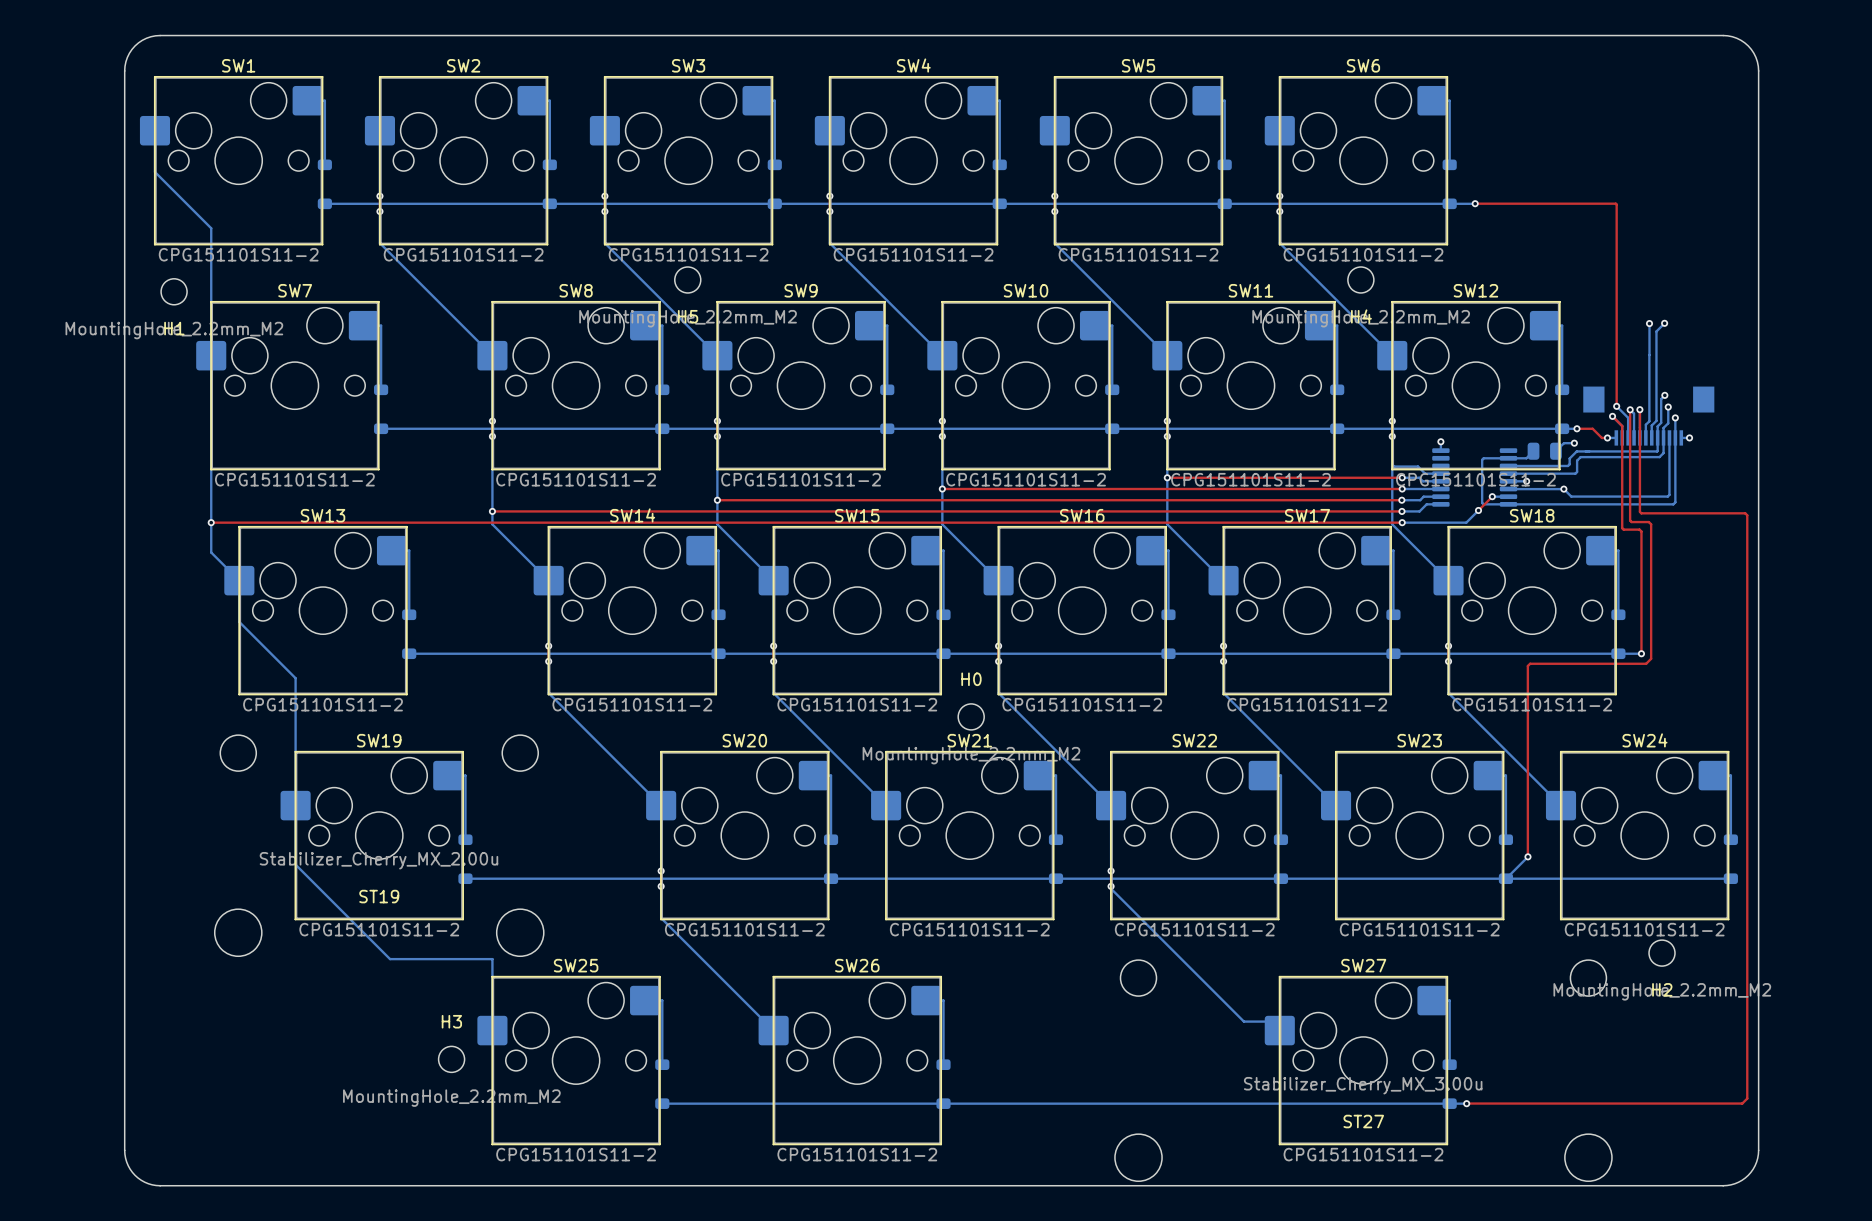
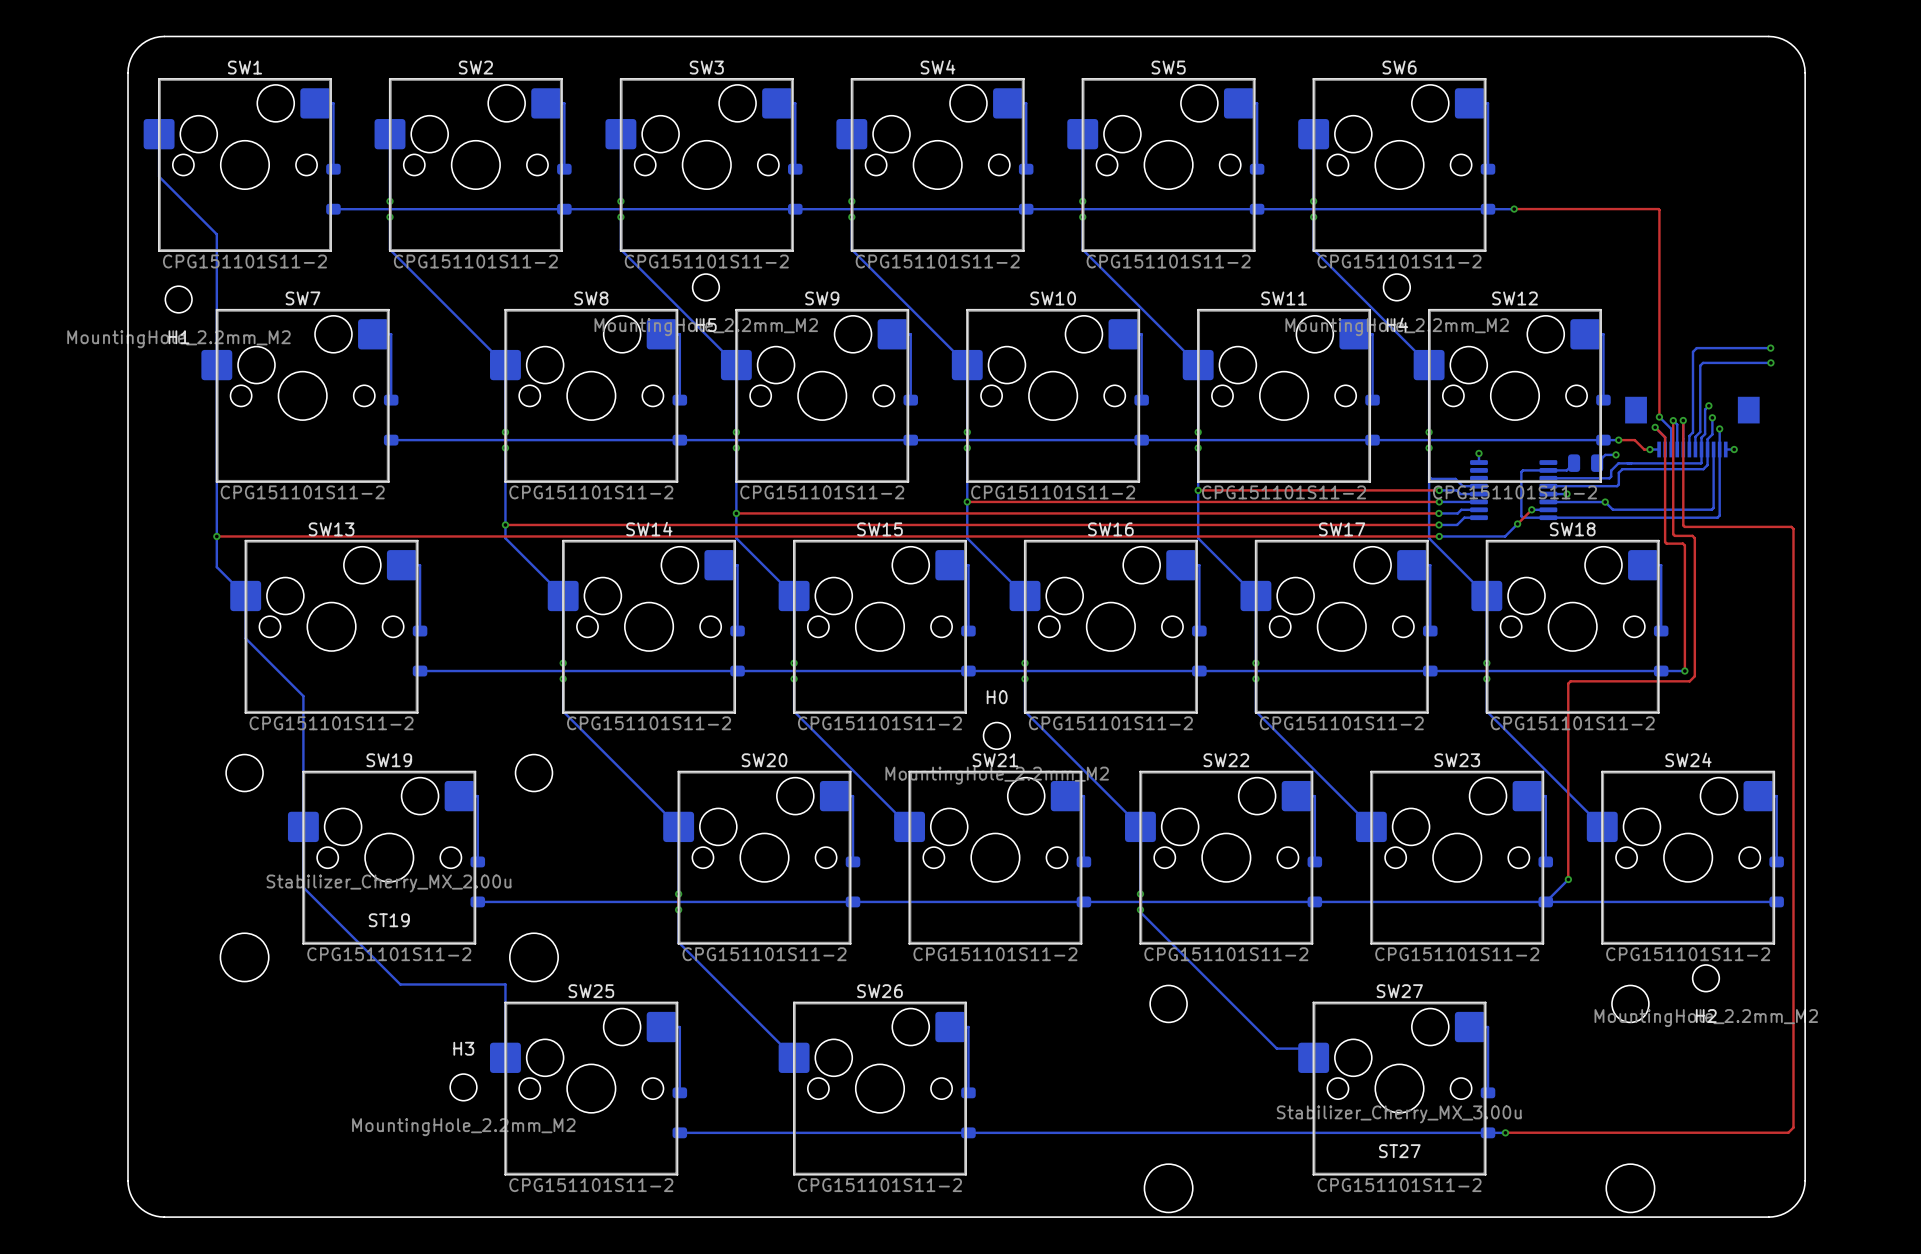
bottom track: (1649, 323) (1649, 354) -> (1770, 348) (1696, 348) (1693, 351) (1693, 364)
via: (1649, 323) -> none
bottom track: (1664, 323) (1656, 331) (1656, 356) -> (1770, 362) (1703, 362) (1700, 365)
via: (1664, 323) -> none
via: none -> (1770, 348)
via: none -> (1770, 362)

